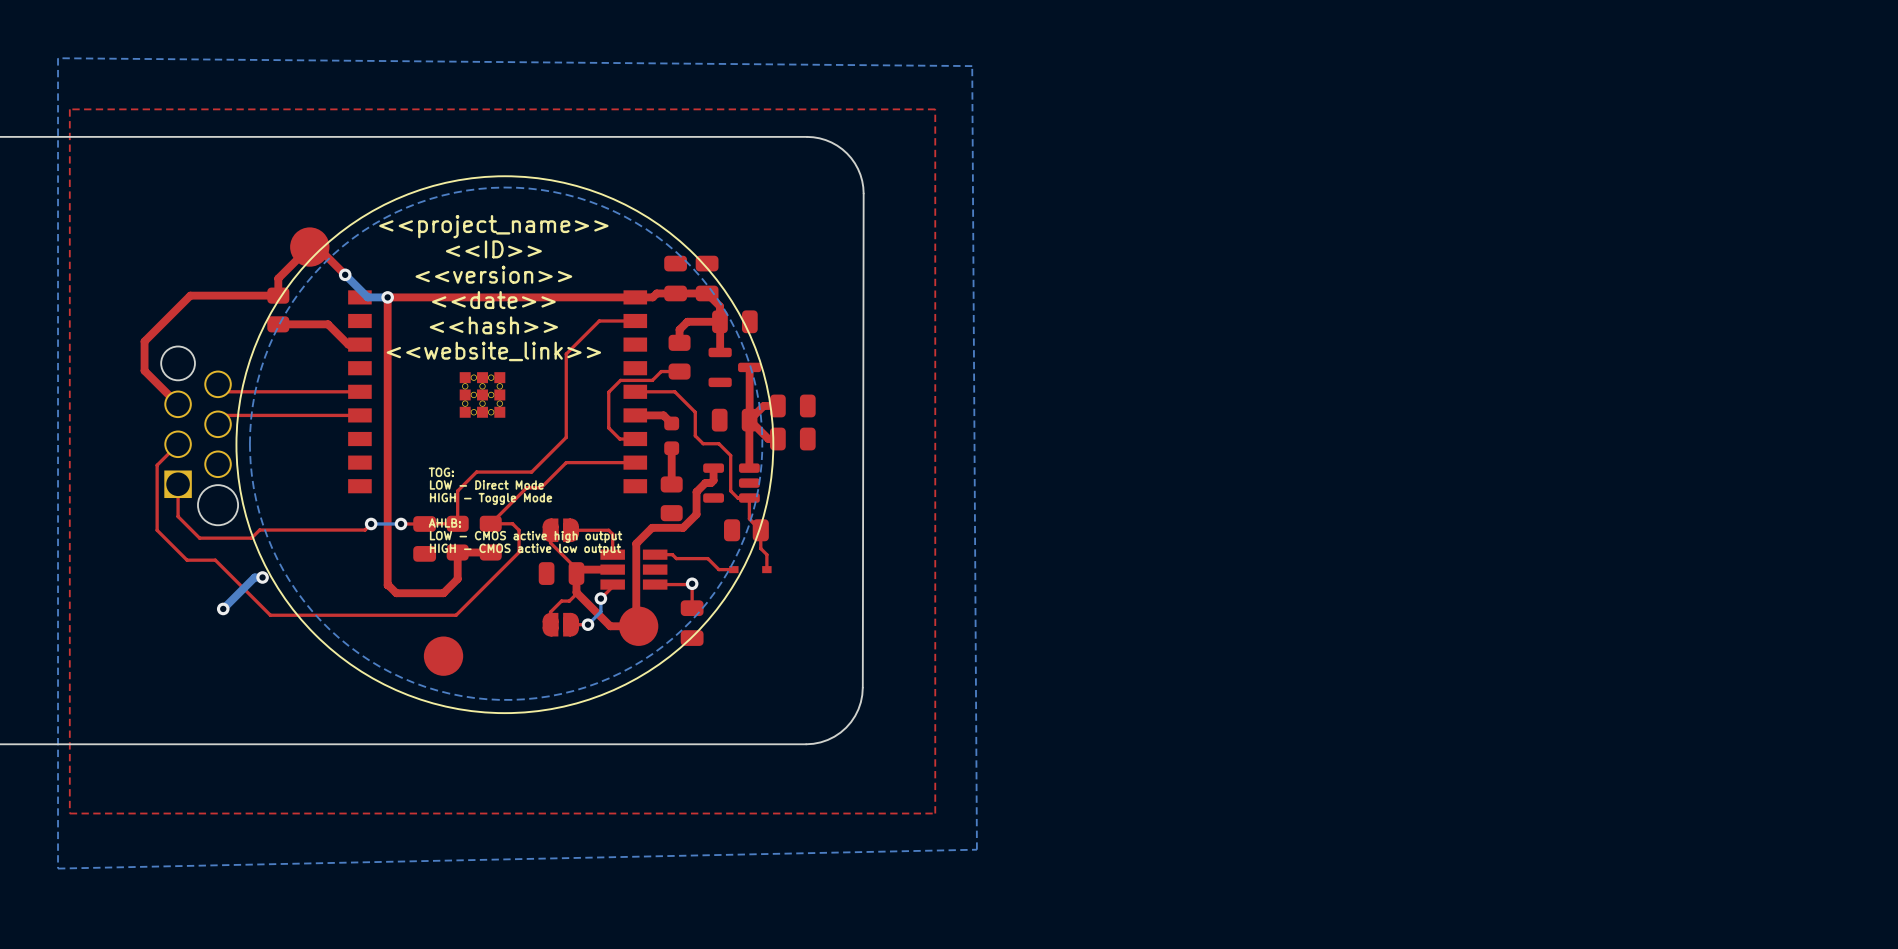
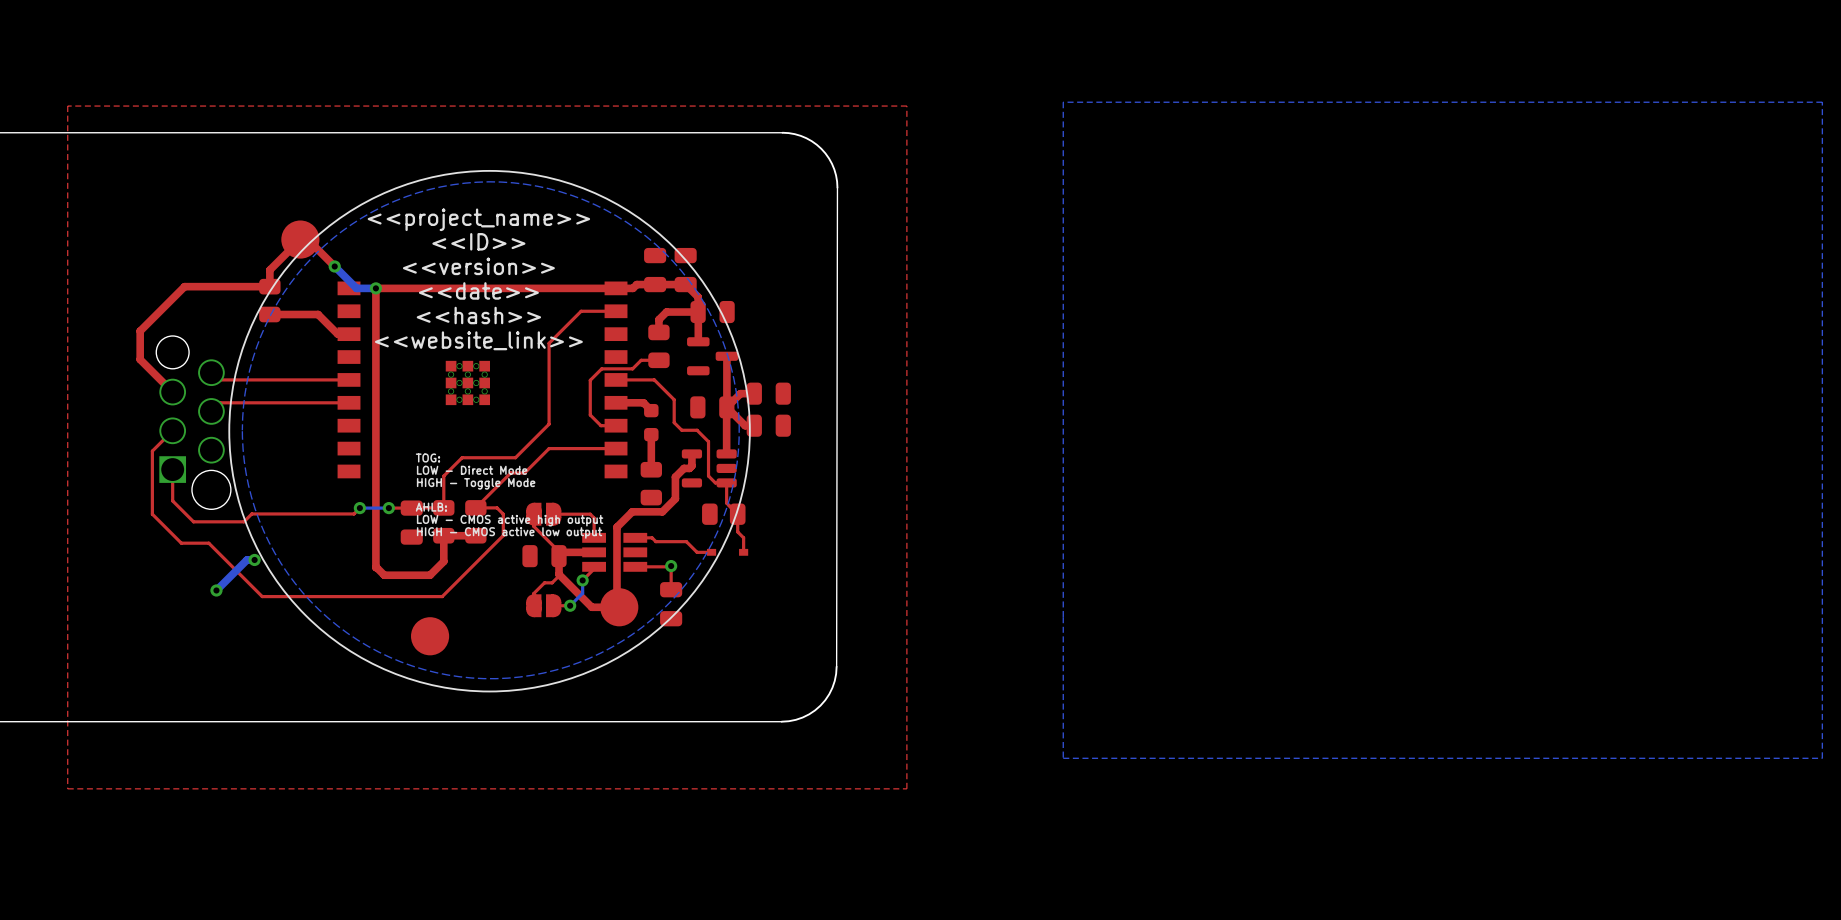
bottom zone outline: (58, 58) (972, 66) (976, 849) (58, 868) (58, 58) -> none
bottom zone outline: none -> (1822, 102) (1822, 758) (1063, 758) (1063, 102) (1822, 102)

